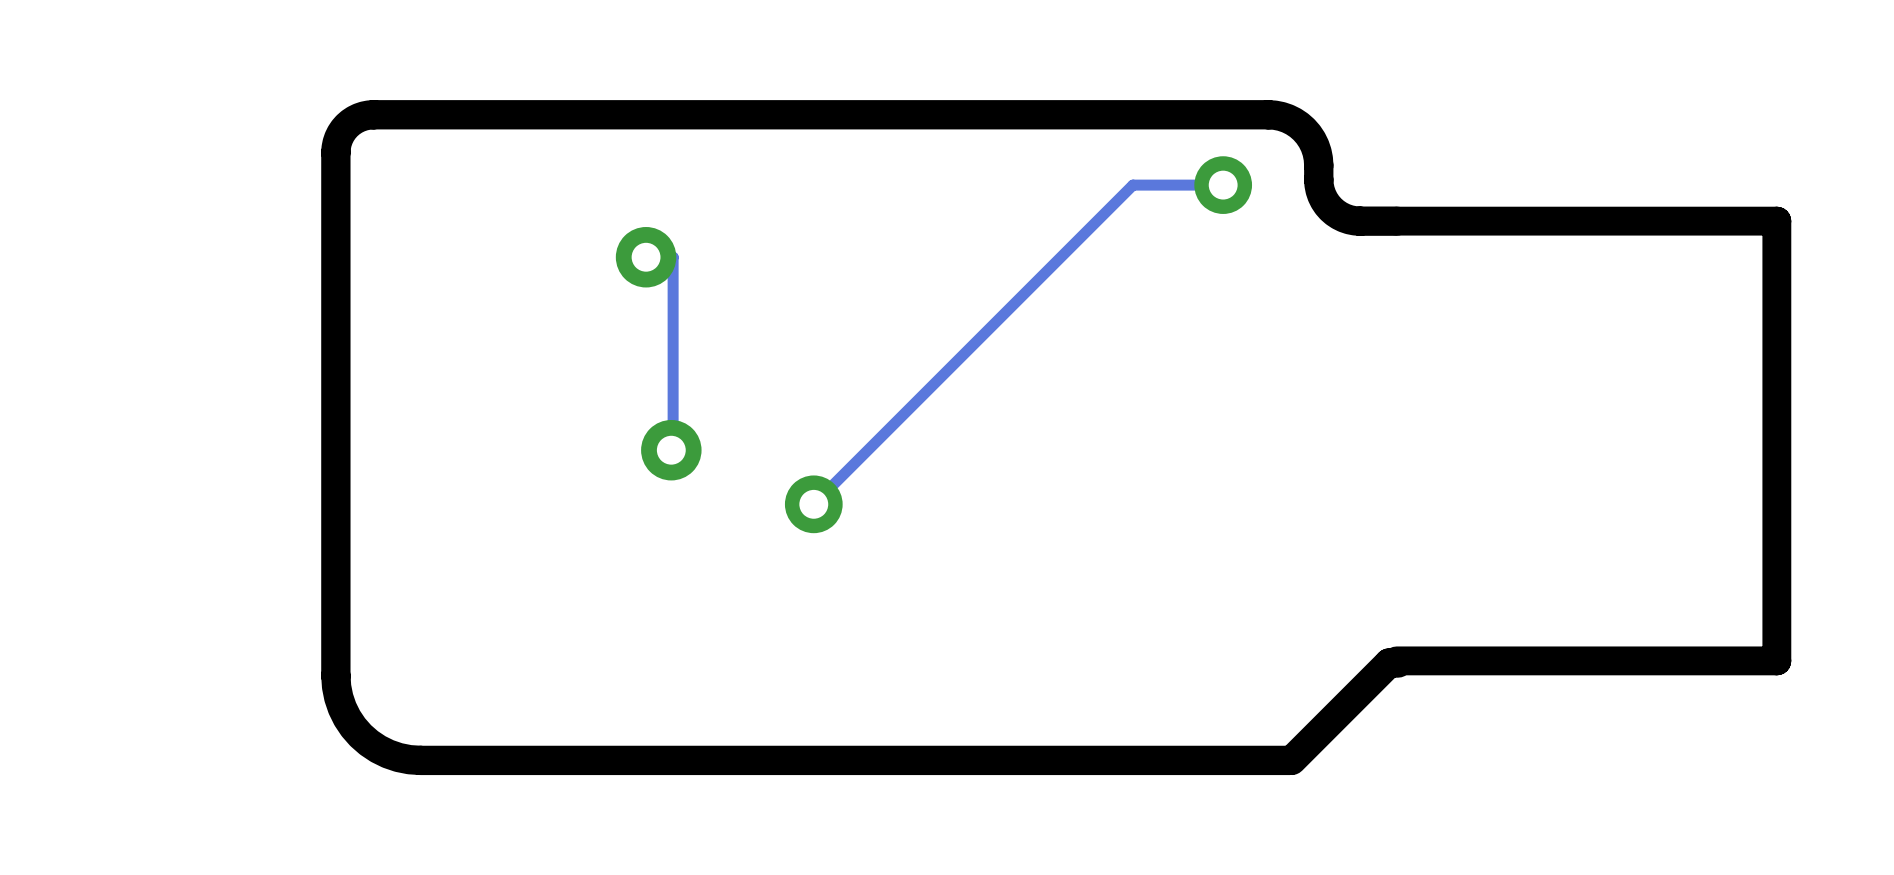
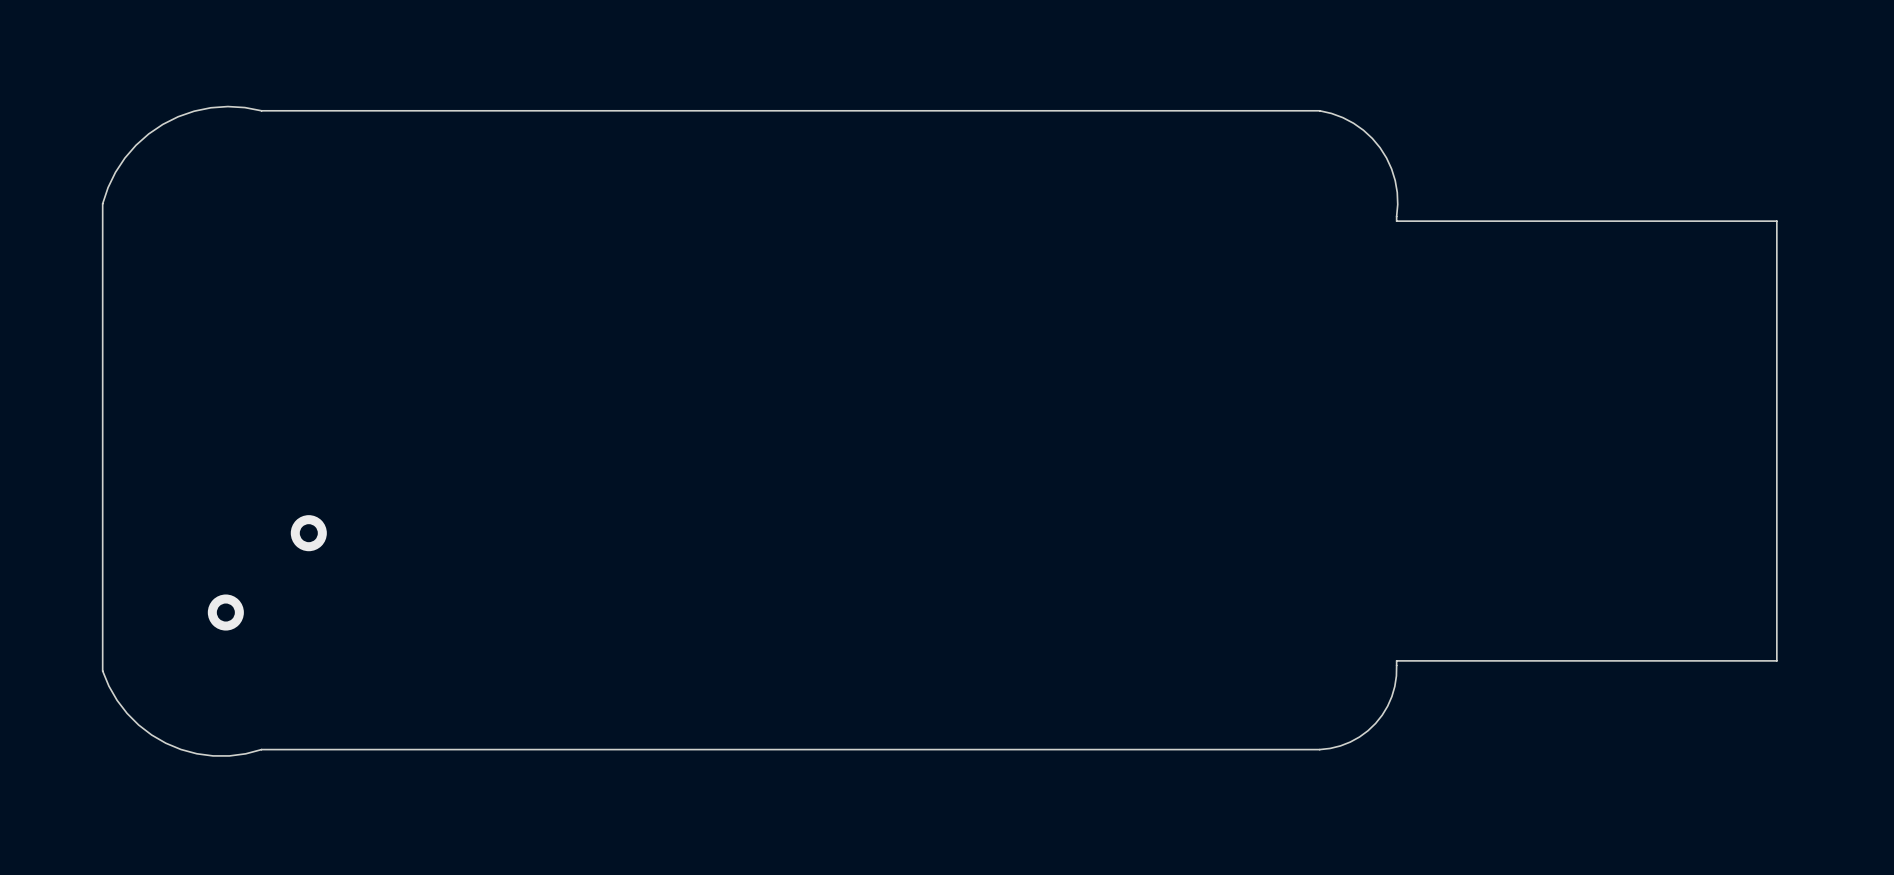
track: (1223, 185) (1133, 185) (813, 504) -> none
via: (1223, 185) -> none
board edge: none -> (1396, 216) (1397, 192) (1395, 180) (1391, 168) (1380, 147) (1363, 130) (1353, 123) (1342, 117) (1319, 110) (261, 110) (227, 106) (210, 107) (178, 116) (148, 133) (136, 145) (115, 172) (102, 203) (102, 671) (117, 700) (138, 725) (165, 743) (180, 749) (213, 755) (229, 755) (261, 749) (1319, 749) (1350, 742) (1375, 723) (1391, 696) (1396, 665)
board edge: (1396, 221) (1354, 220) (1334, 212) (1327, 204) (1320, 190) (1318, 158) (1312, 140) (1299, 125) (1287, 118) (1274, 115) (373, 114) (359, 117) (346, 125) (338, 138) (336, 147) (336, 686) (347, 718) (360, 735) (378, 749) (398, 757) (420, 760) (1289, 760) -> none
board edge width: thick (1396, 221) (1776, 221) (1776, 660) (1396, 660) -> thin (1396, 221) (1776, 221) (1776, 660) (1396, 660)
track: (646, 257) (673, 257) (673, 452) -> none
via: (646, 257) -> none
via: (671, 450) -> none
via: (813, 504) -> none
via: none -> (308, 533)
via: none -> (225, 612)
board edge: (1398, 663) (1389, 663) (1291, 760) -> none

